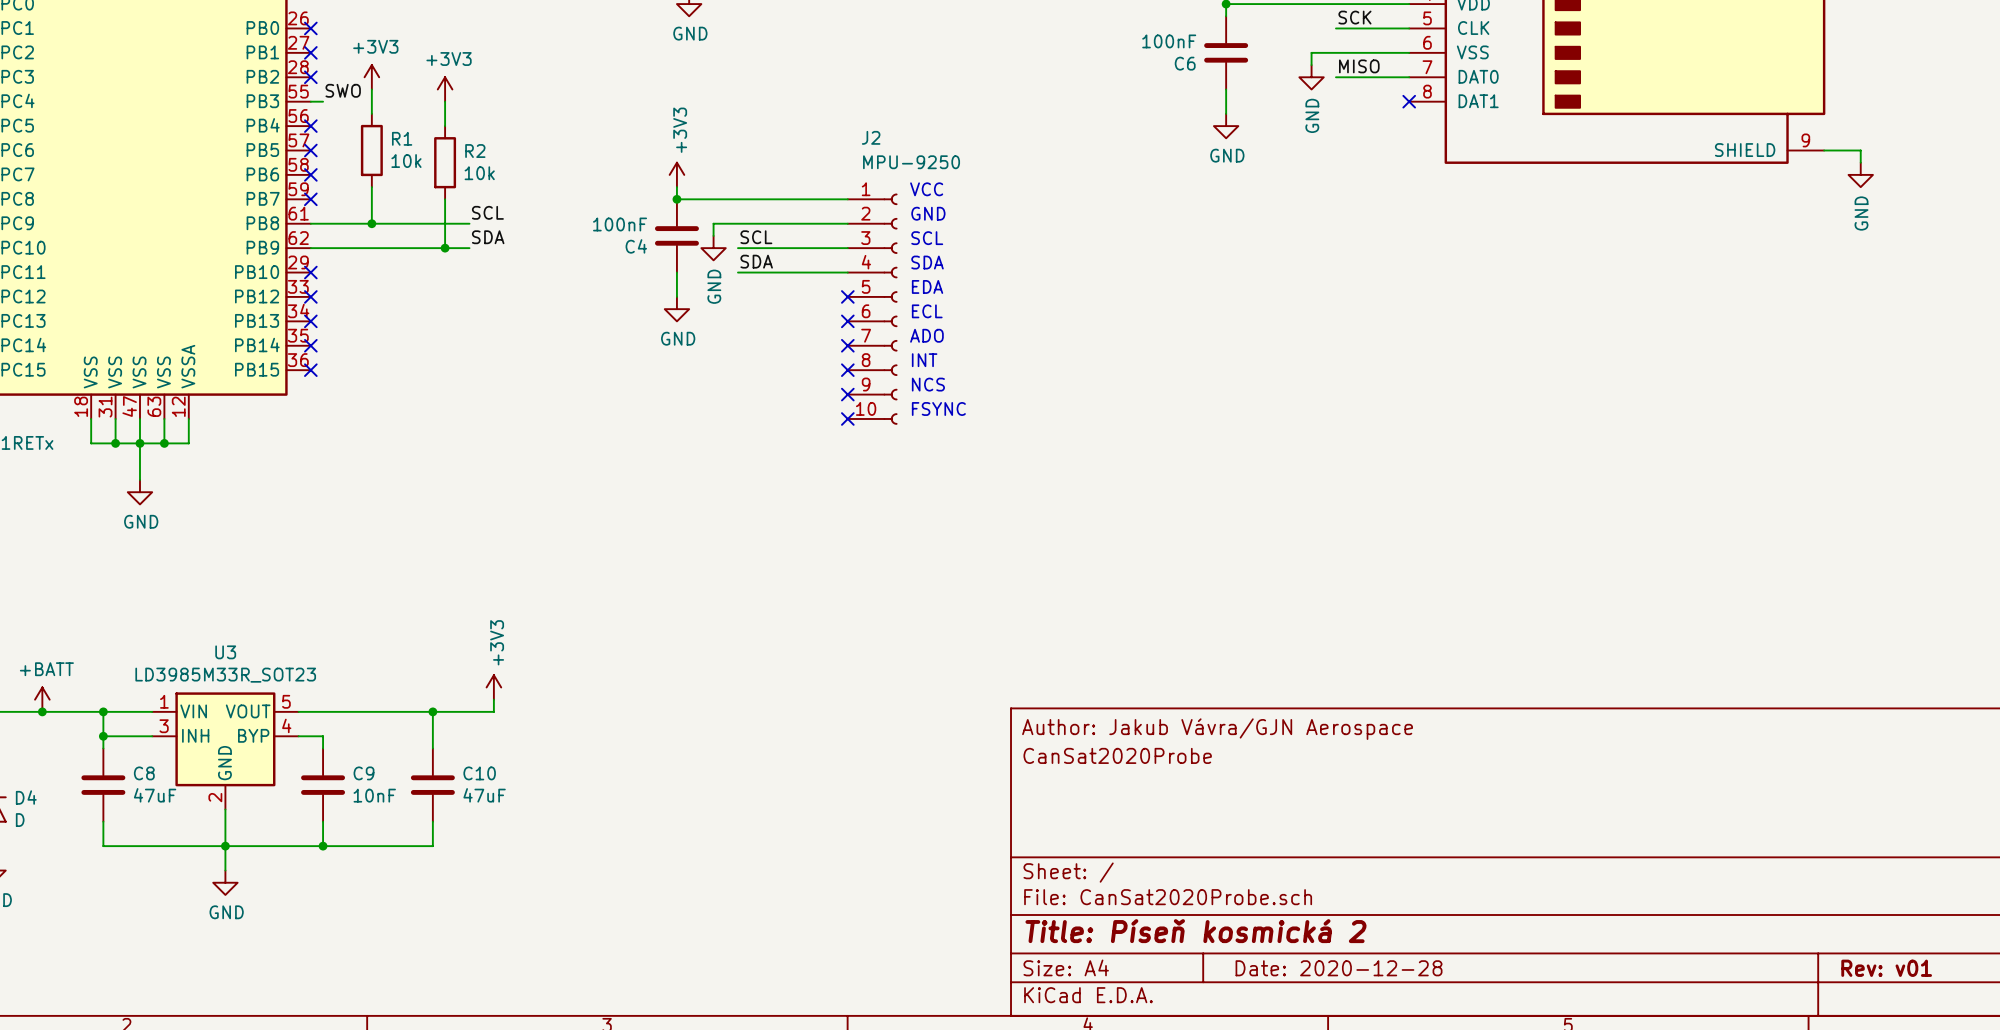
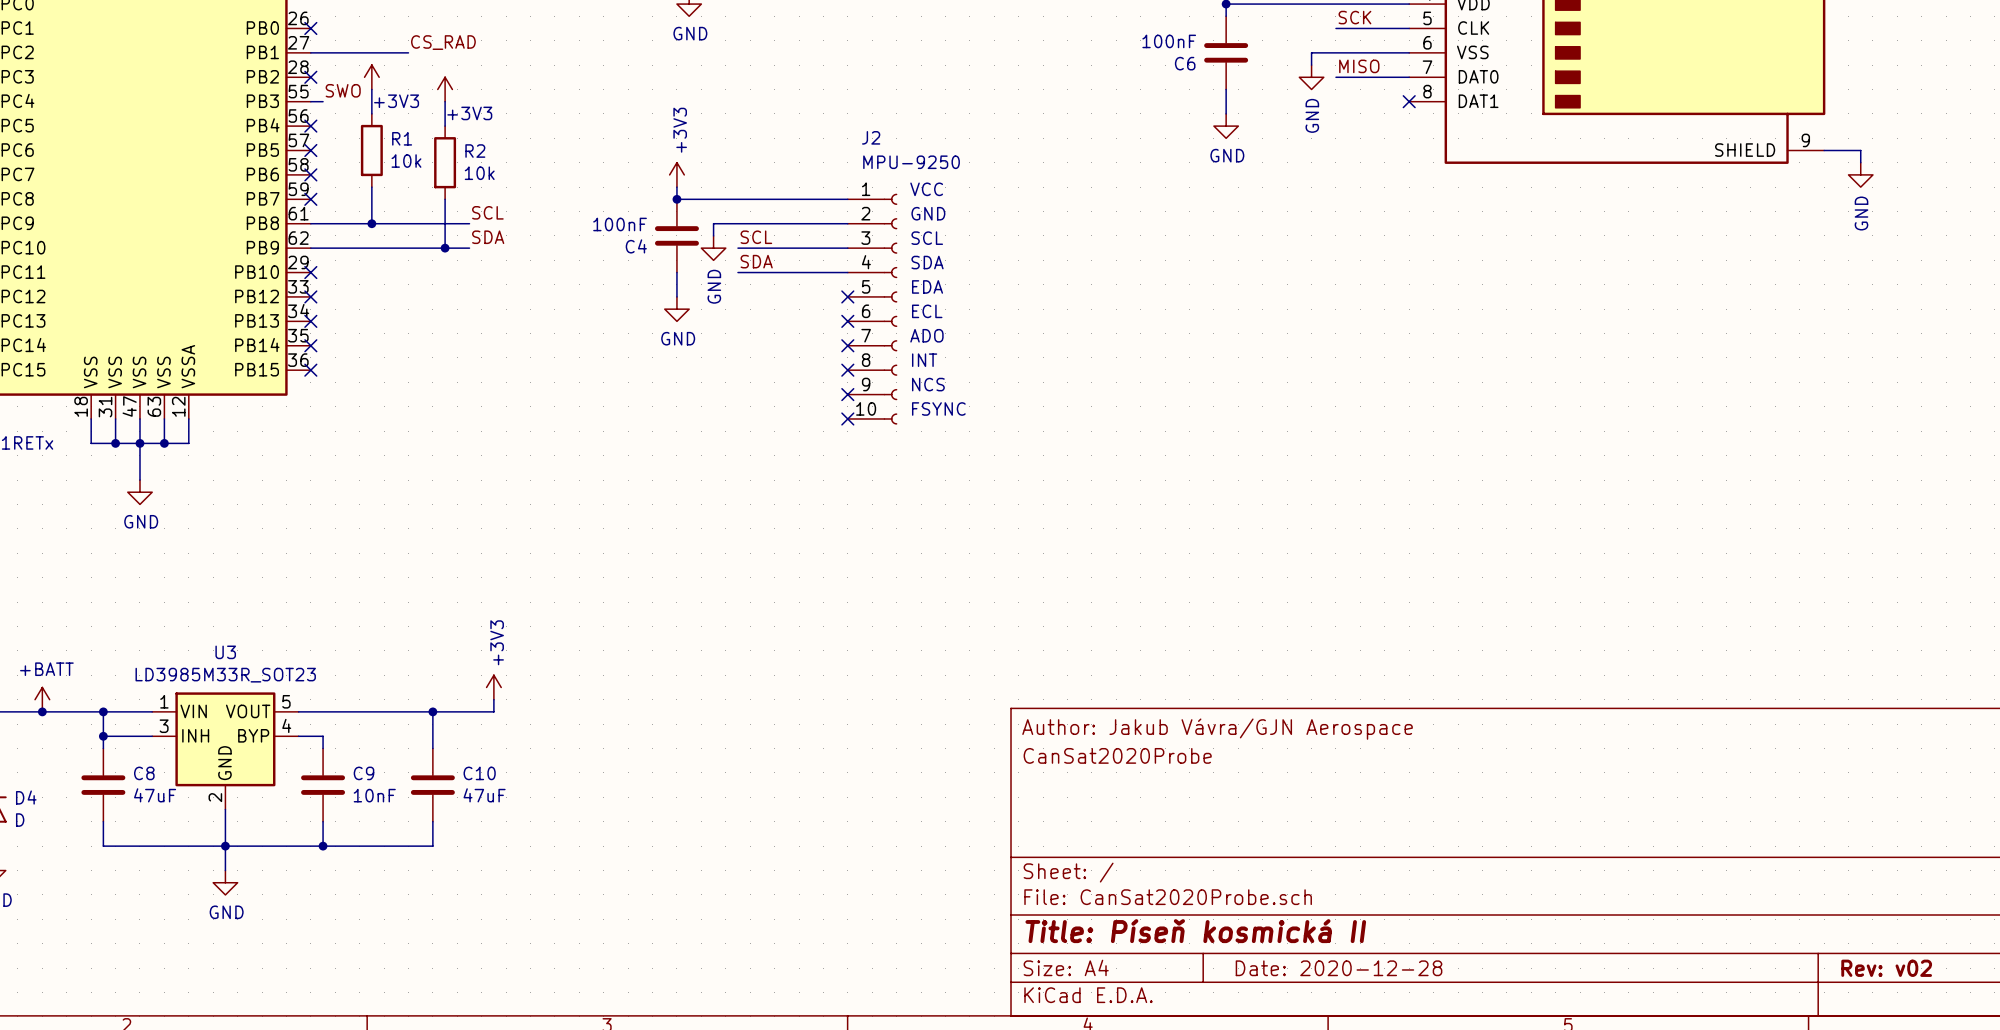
label: none -> CS_RAD (443, 42)
power symbol text position: +3V3 (375, 46) -> +3V3 (396, 101)
wire: none -> (310, 52) (408, 52)
no-connect mark: (310, 52) -> none
power symbol text position: +3V3 (449, 59) -> +3V3 (469, 113)
title block: Title: Píseň kosmická 2 (1195, 931) -> Title: Píseň kosmická II (1195, 931)
title block: Rev: v01 (1886, 968) -> Rev: v02 (1886, 968)

